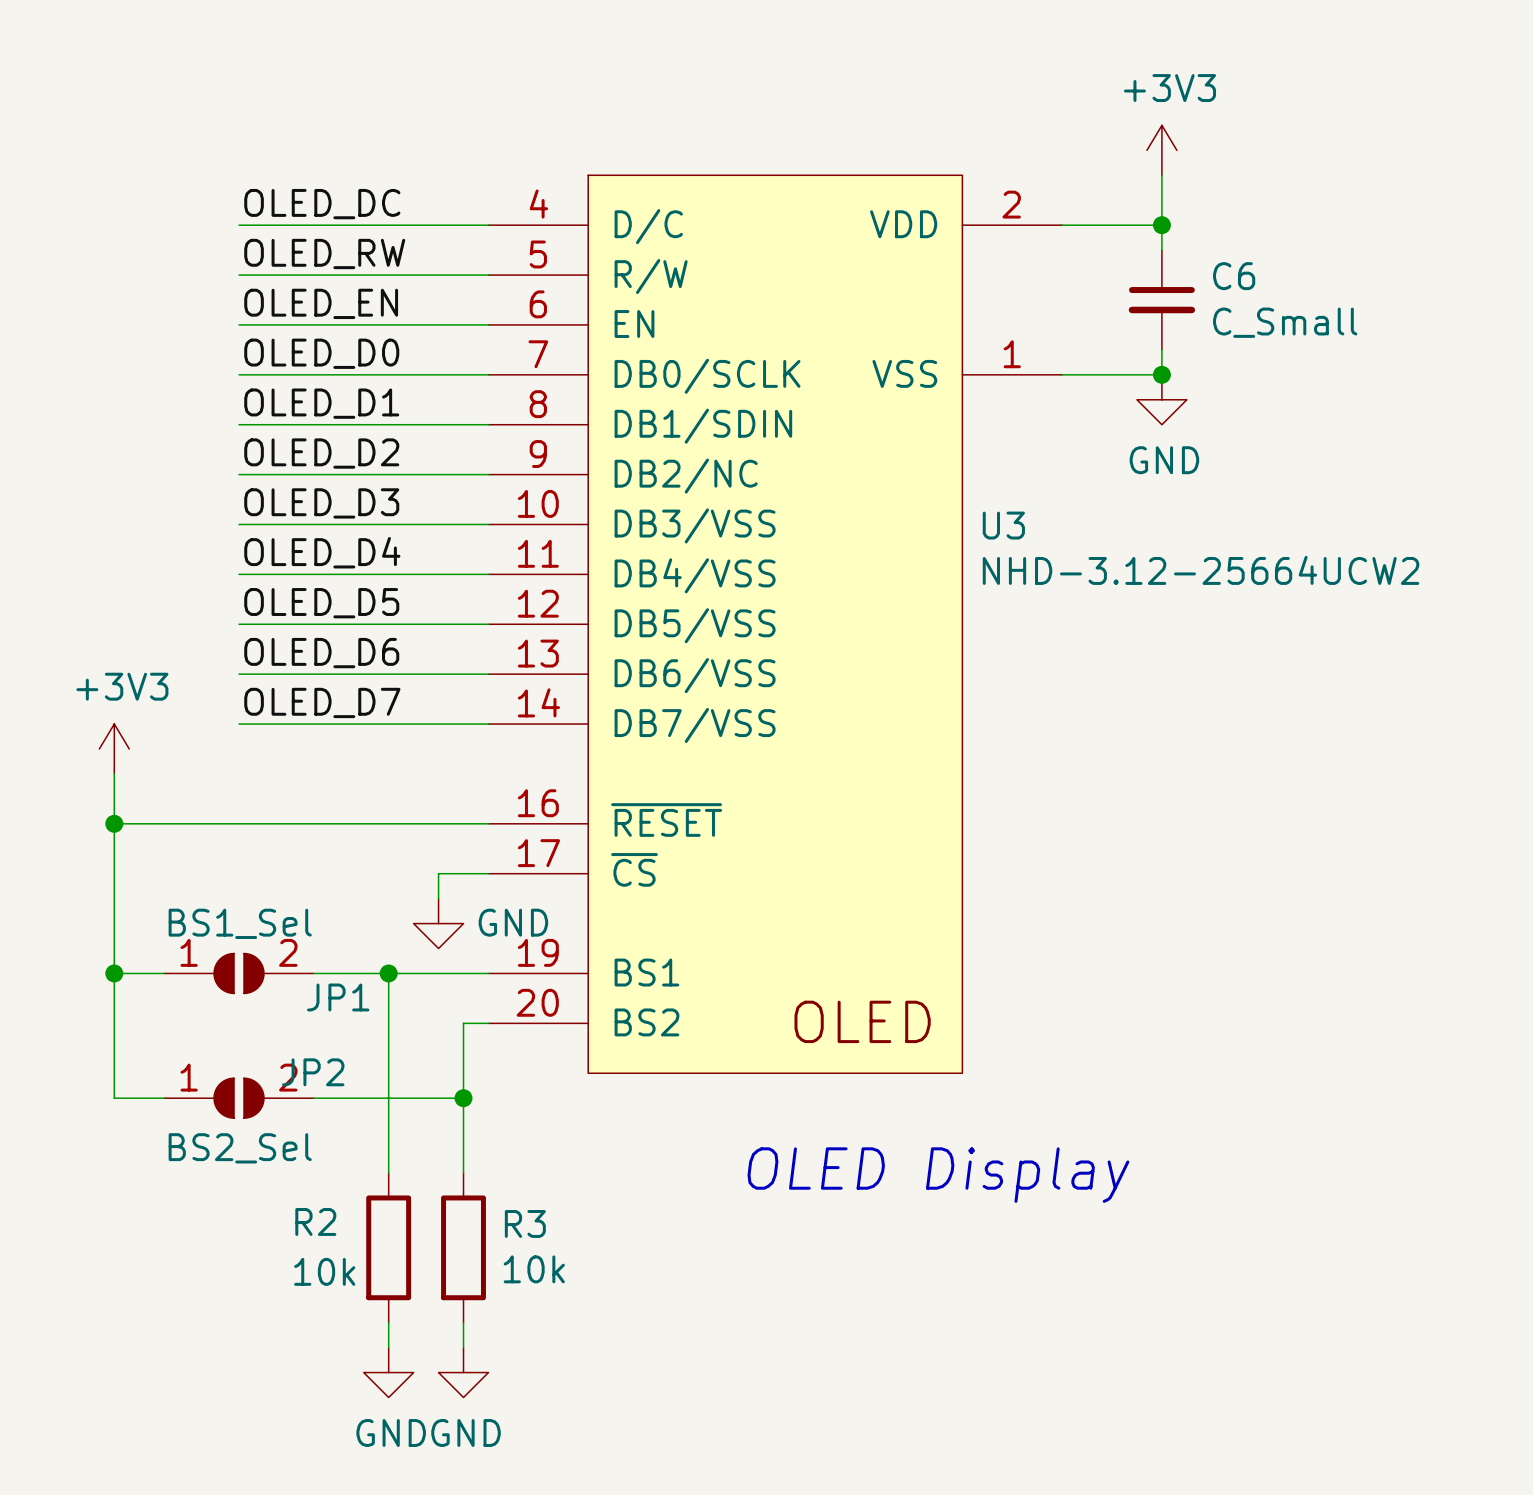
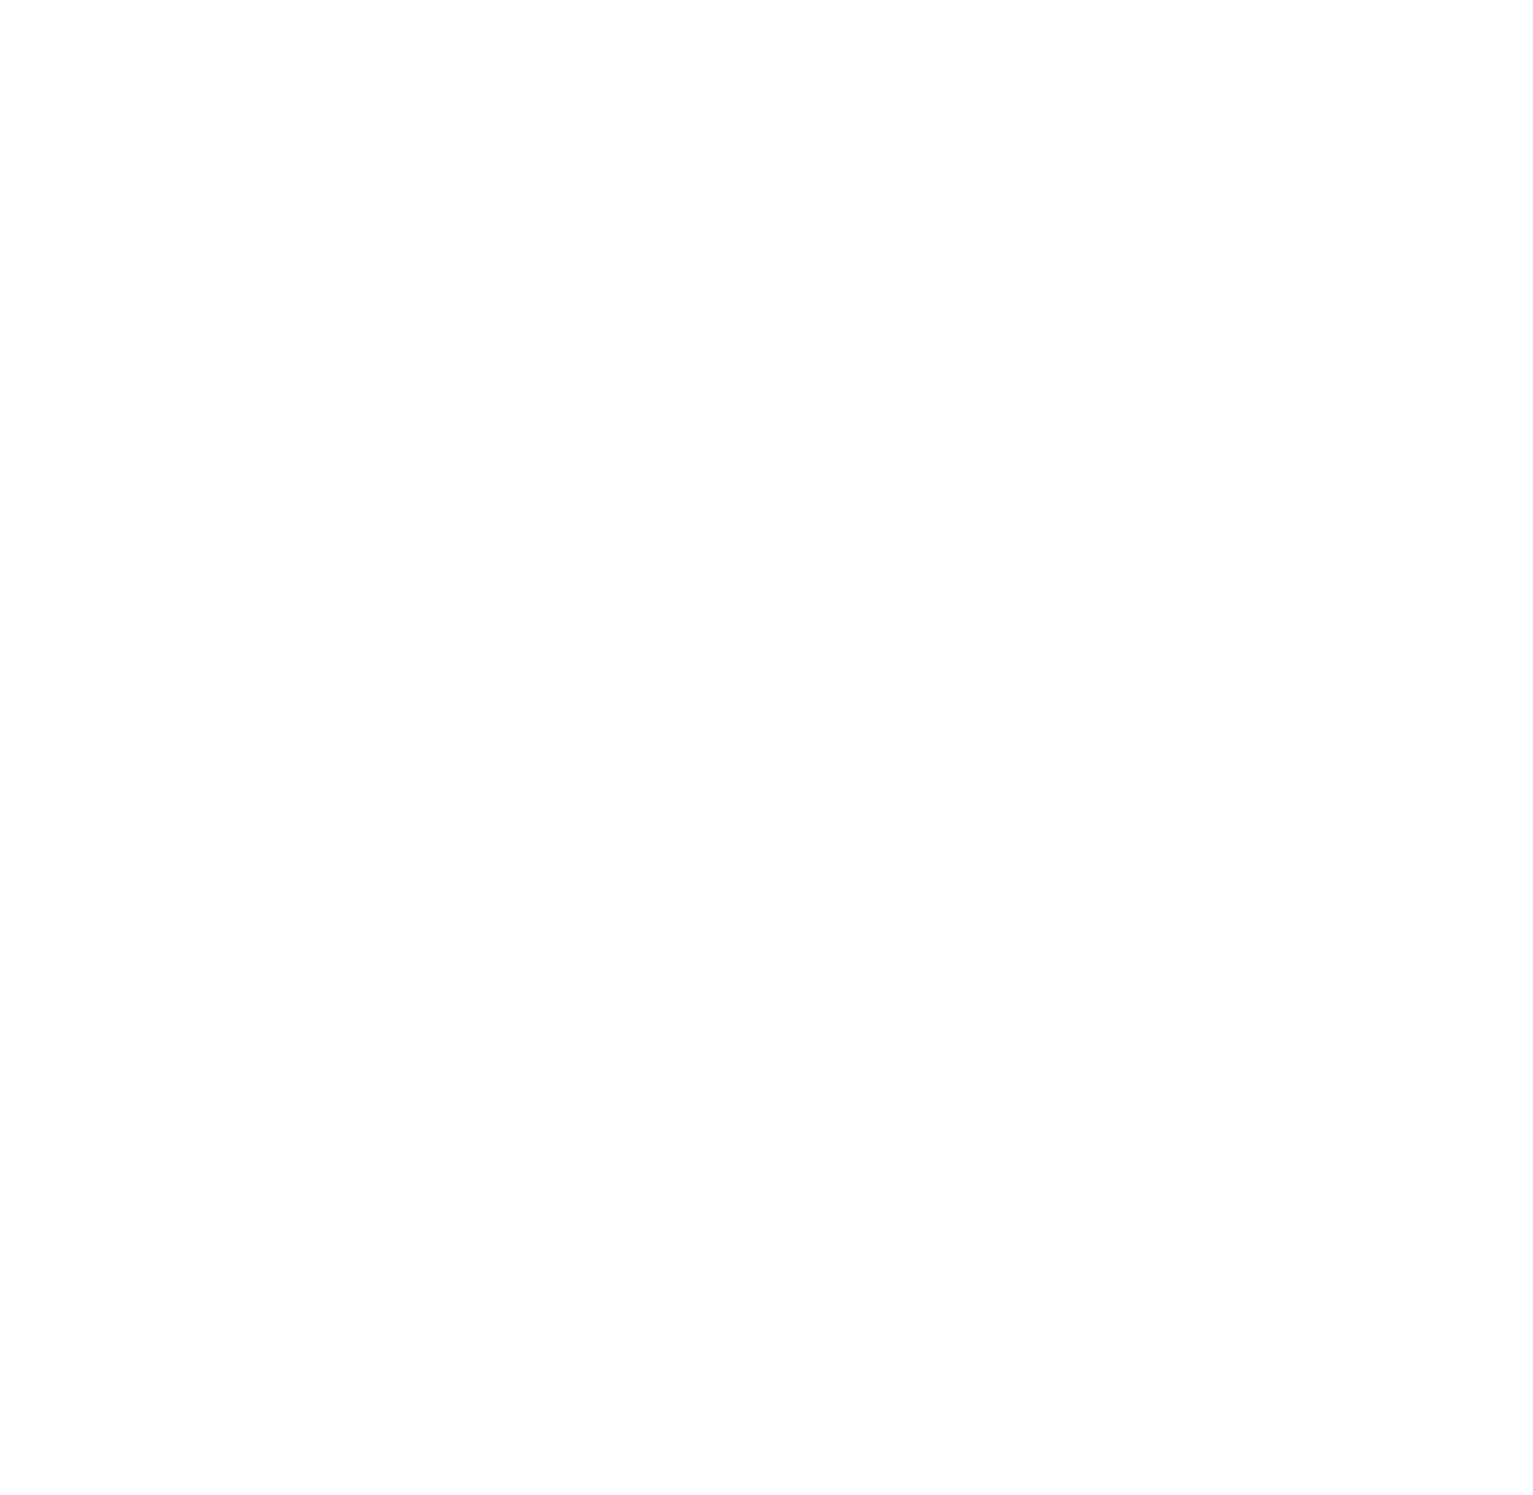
power symbol: +3V3 (1161, 150) -> none
wire: (1161, 175) (1161, 250) -> none
label: OLED_DC (322, 204) -> none
wire: (239, 225) (488, 225) -> none
wire: (1062, 225) (1161, 225) -> none
junction: (1161, 225) -> none
label: OLED_RW (324, 253) -> none
wire: (239, 275) (488, 275) -> none
C6: C_Small (1161, 300) -> none
label: OLED_EN (321, 303) -> none
wire: (239, 324) (488, 324) -> none
wire: (1161, 349) (1161, 374) (1062, 374) -> none
label: OLED_D0 (321, 353) -> none
wire: (239, 374) (488, 374) -> none
junction: (1161, 374) -> none
power symbol: GND (1161, 399) -> none
label: OLED_D1 (321, 403) -> none
wire: (239, 424) (488, 424) -> none
label: OLED_D2 (321, 453) -> none
wire: (239, 474) (488, 474) -> none
label: OLED_D3 (321, 503) -> none
wire: (239, 524) (488, 524) -> none
label: OLED_D4 (322, 552) -> none
wire: (239, 574) (488, 574) -> none
label: OLED_D5 (321, 603) -> none
wire: (239, 624) (488, 624) -> none
U3: NHD-3.12-25664UCW2 (775, 624) -> none
label: OLED_D6 (321, 653) -> none
wire: (239, 674) (488, 674) -> none
label: OLED_D7 (322, 702) -> none
wire: (239, 724) (488, 724) -> none
power symbol: +3V3 (114, 748) -> none
wire: (114, 773) (114, 1098) (164, 1098) -> none
wire: (114, 823) (488, 823) -> none
junction: (114, 823) -> none
wire: (488, 873) (438, 873) (438, 898) -> none
power symbol: GND (438, 923) -> none
wire: (114, 973) (164, 973) -> none
junction: (114, 973) -> none
JP1: BS1_Sel (239, 973) -> none
wire: (313, 973) (488, 973) -> none
wire: (388, 973) (388, 1173) -> none
junction: (388, 973) -> none
wire: (488, 1023) (463, 1023) (463, 1173) -> none
JP2: BS2_Sel (239, 1098) -> none
wire: (313, 1098) (463, 1098) -> none
junction: (463, 1098) -> none
text: OLED Display (938, 1175) -> none
R2: 10k (388, 1247) -> none
R3: 10k (463, 1247) -> none
wire: (388, 1322) (388, 1347) -> none
wire: (463, 1322) (463, 1347) -> none
power symbol: GND (388, 1372) -> none
power symbol: GND (463, 1372) -> none

